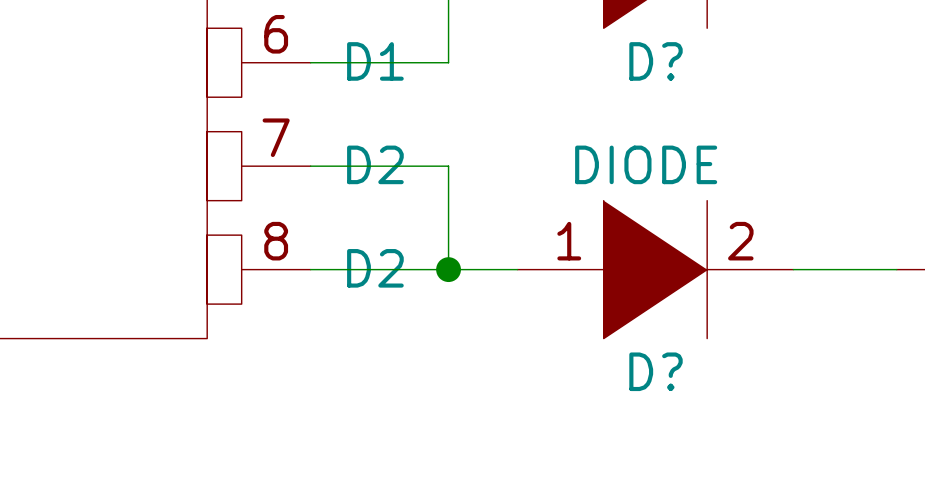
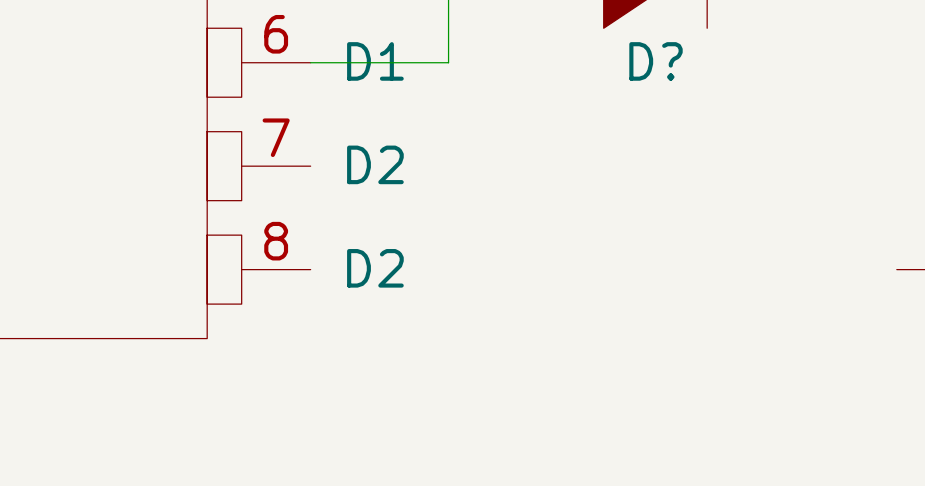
wire: (310, 166) (448, 166) (448, 269) -> none
wire: (310, 269) (517, 269) -> none
junction: (448, 269) -> none
D?: DIODE (655, 269) -> none
wire: (793, 269) (896, 269) -> none

